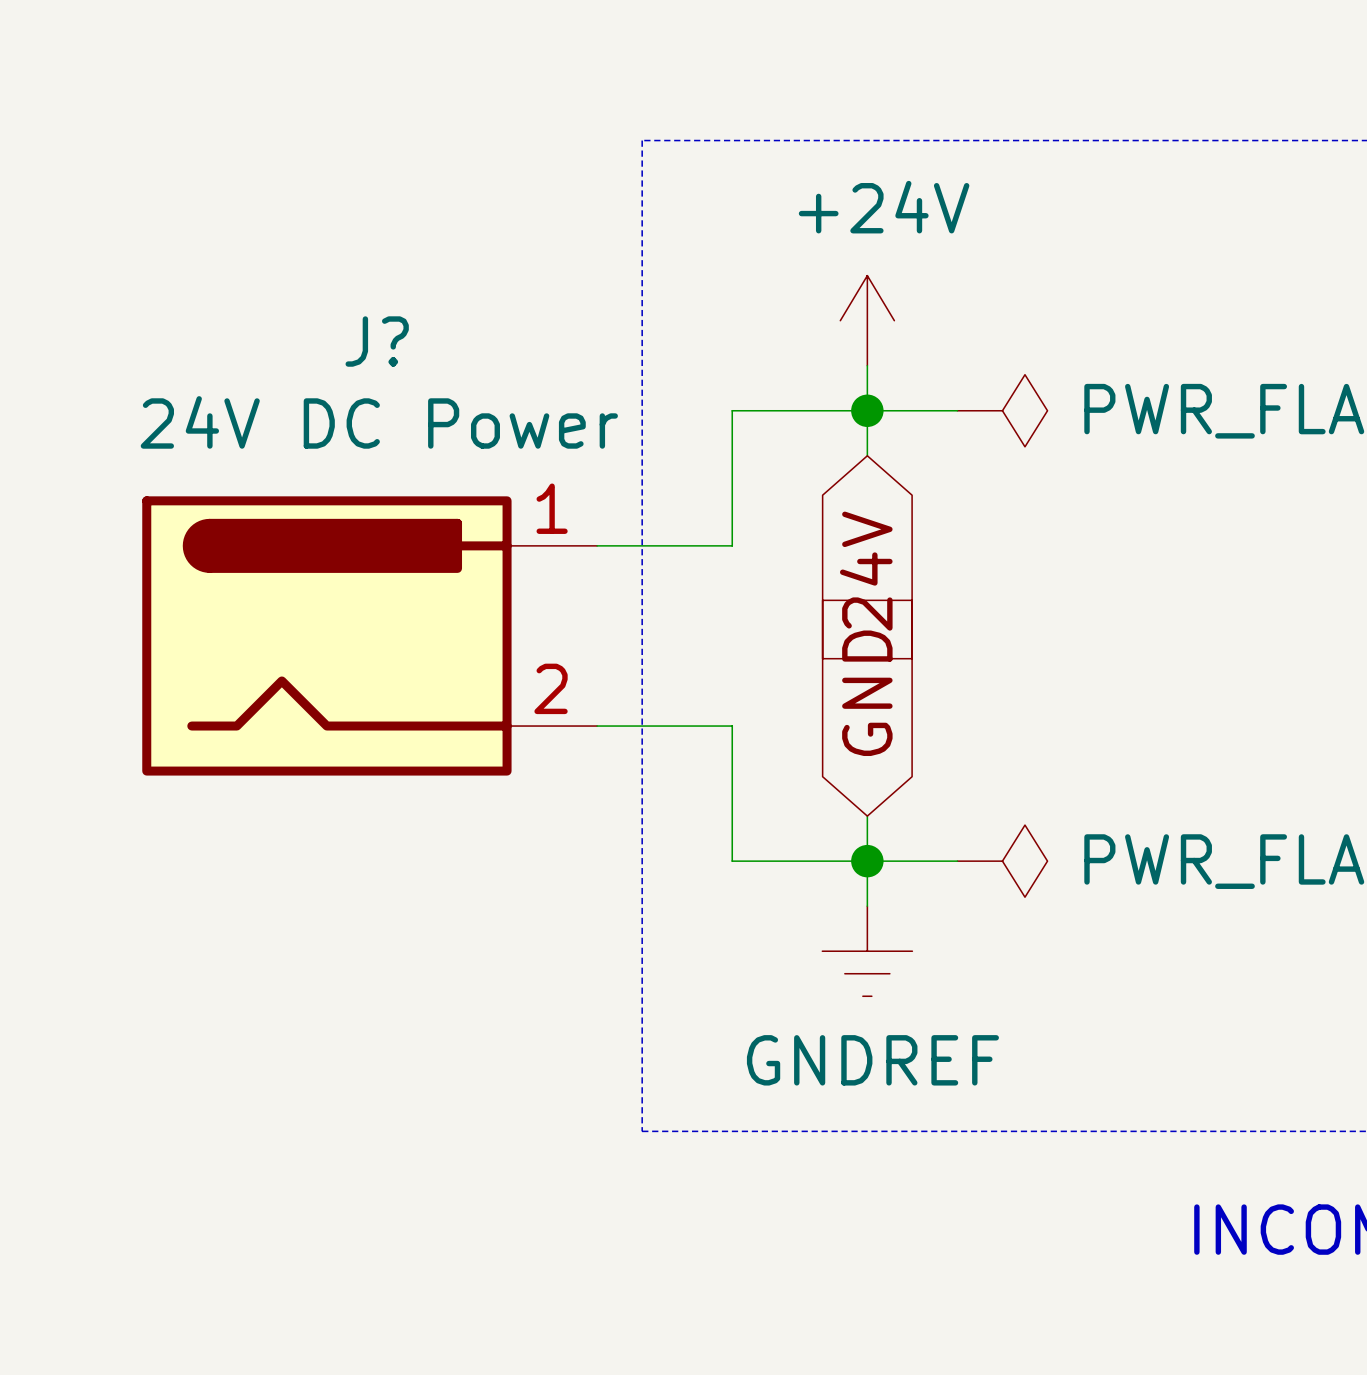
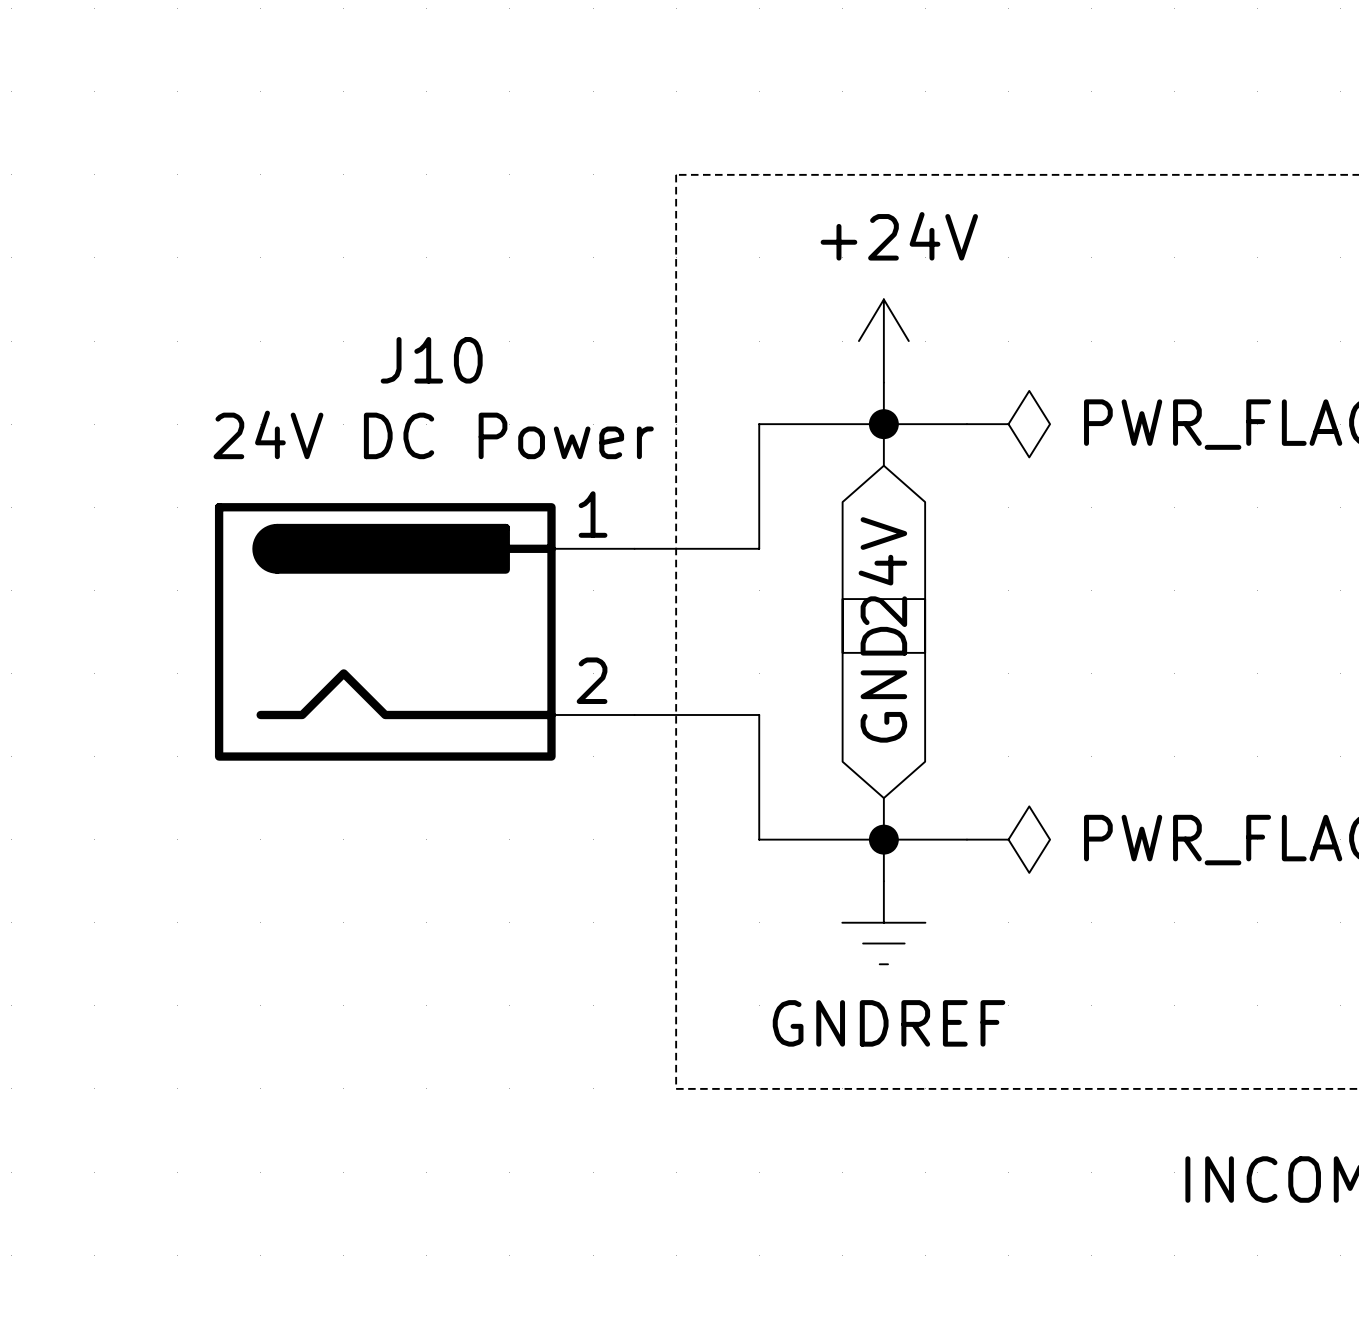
J? name: J? (377, 341) -> J10 (431, 360)

